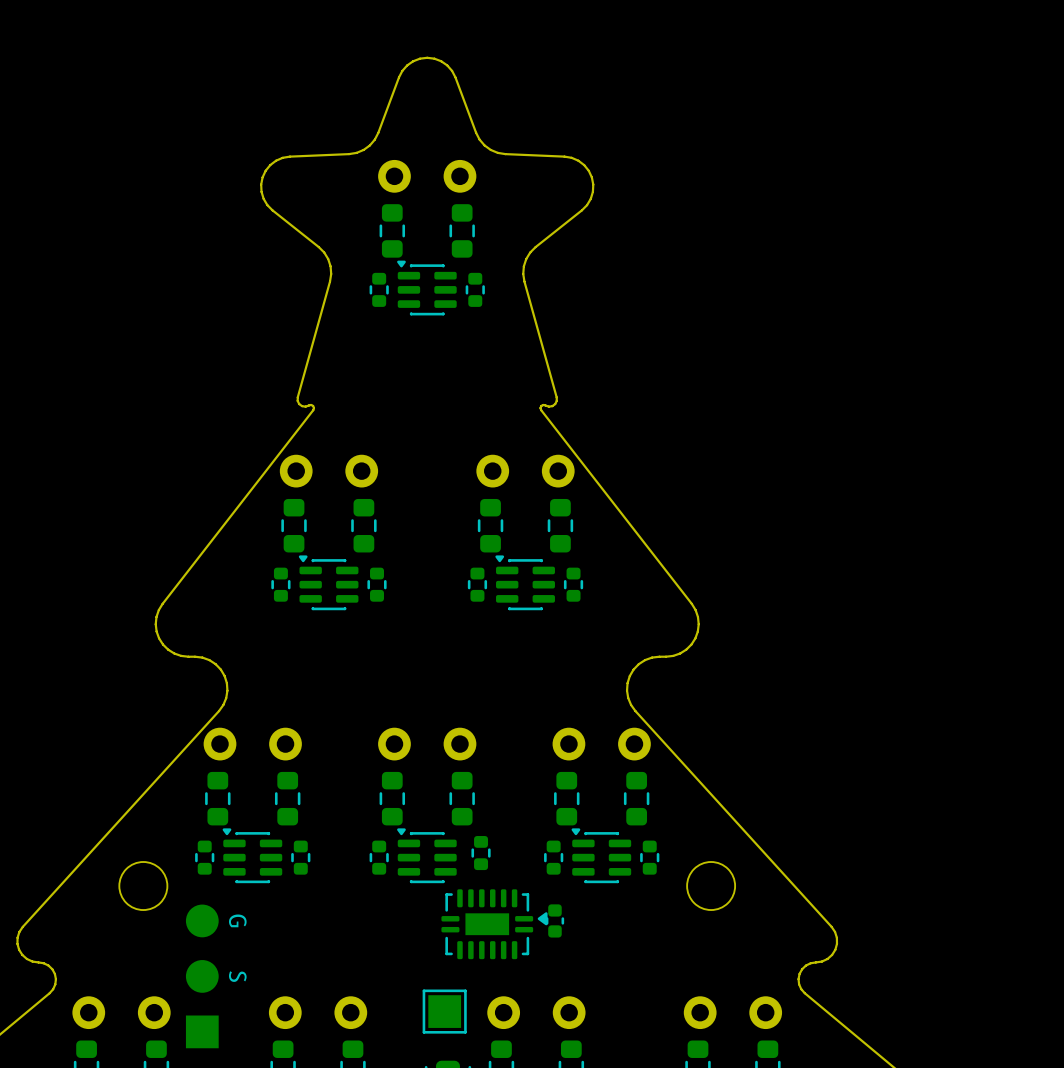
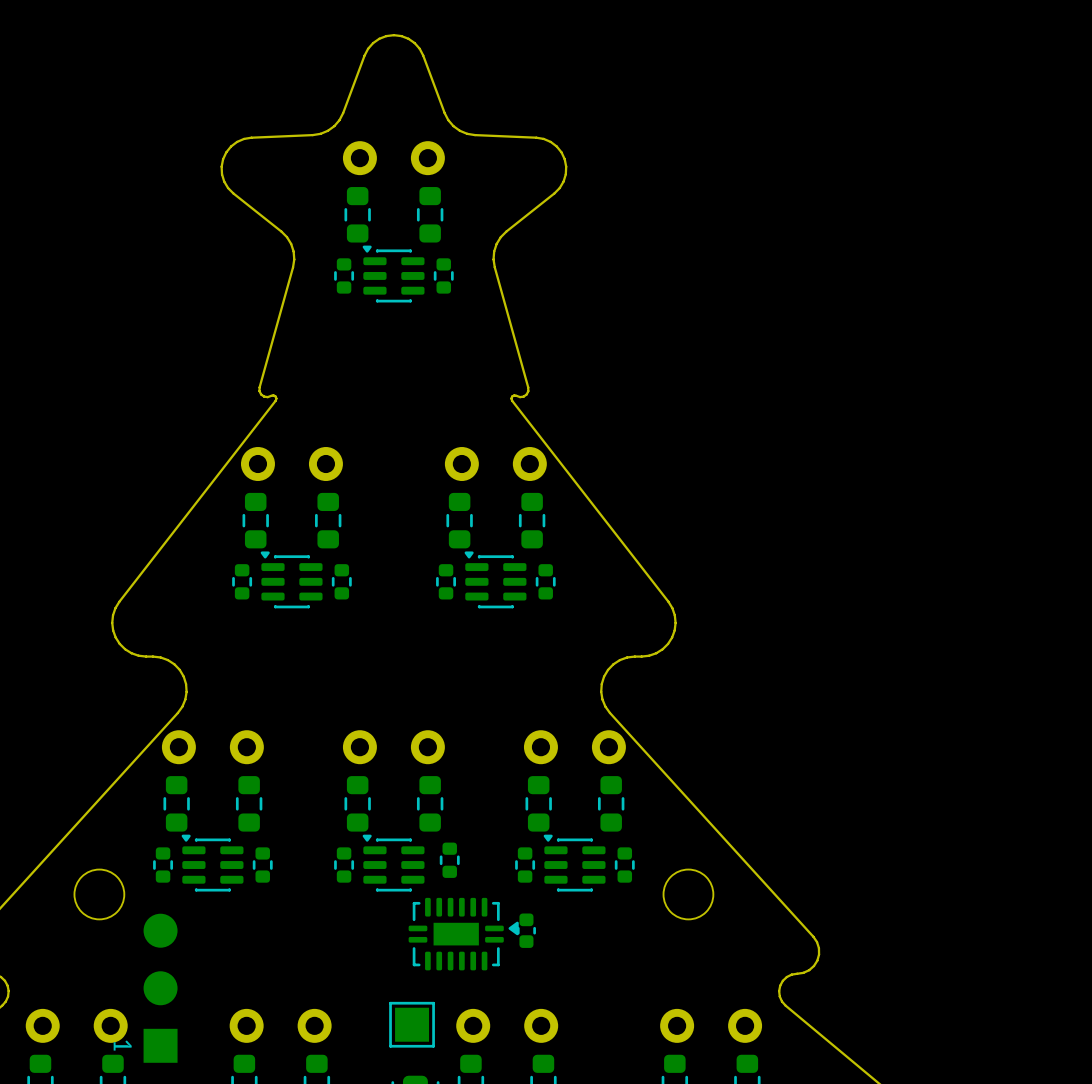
text: G (237, 920) -> none
part text: S (237, 976) -> none
part text: none -> 1 (122, 1045)

